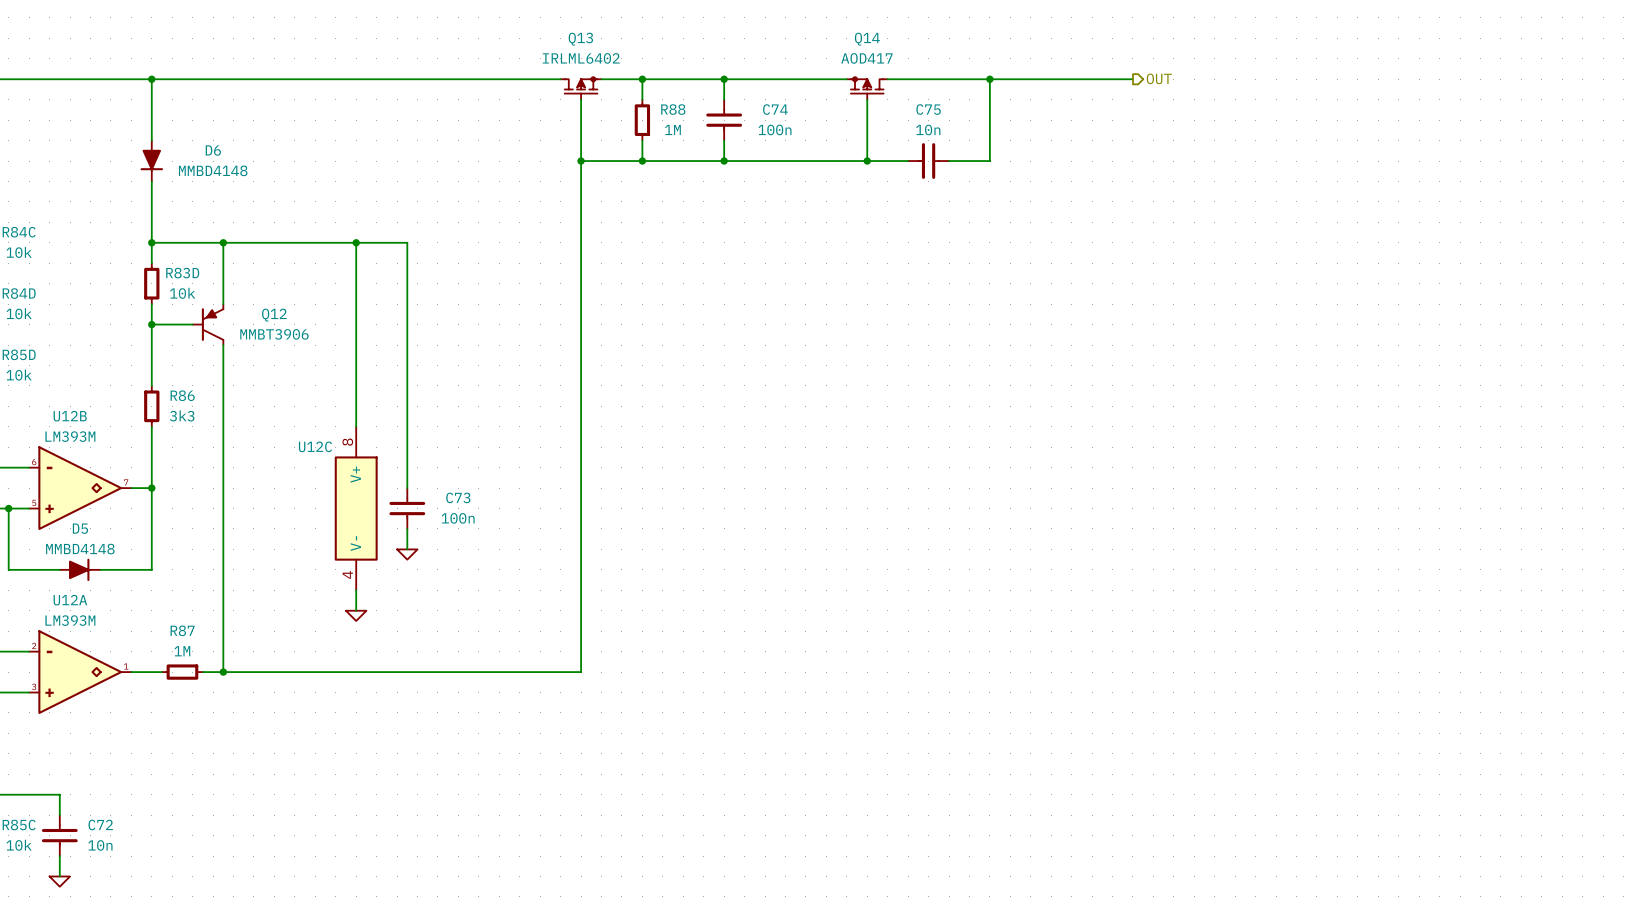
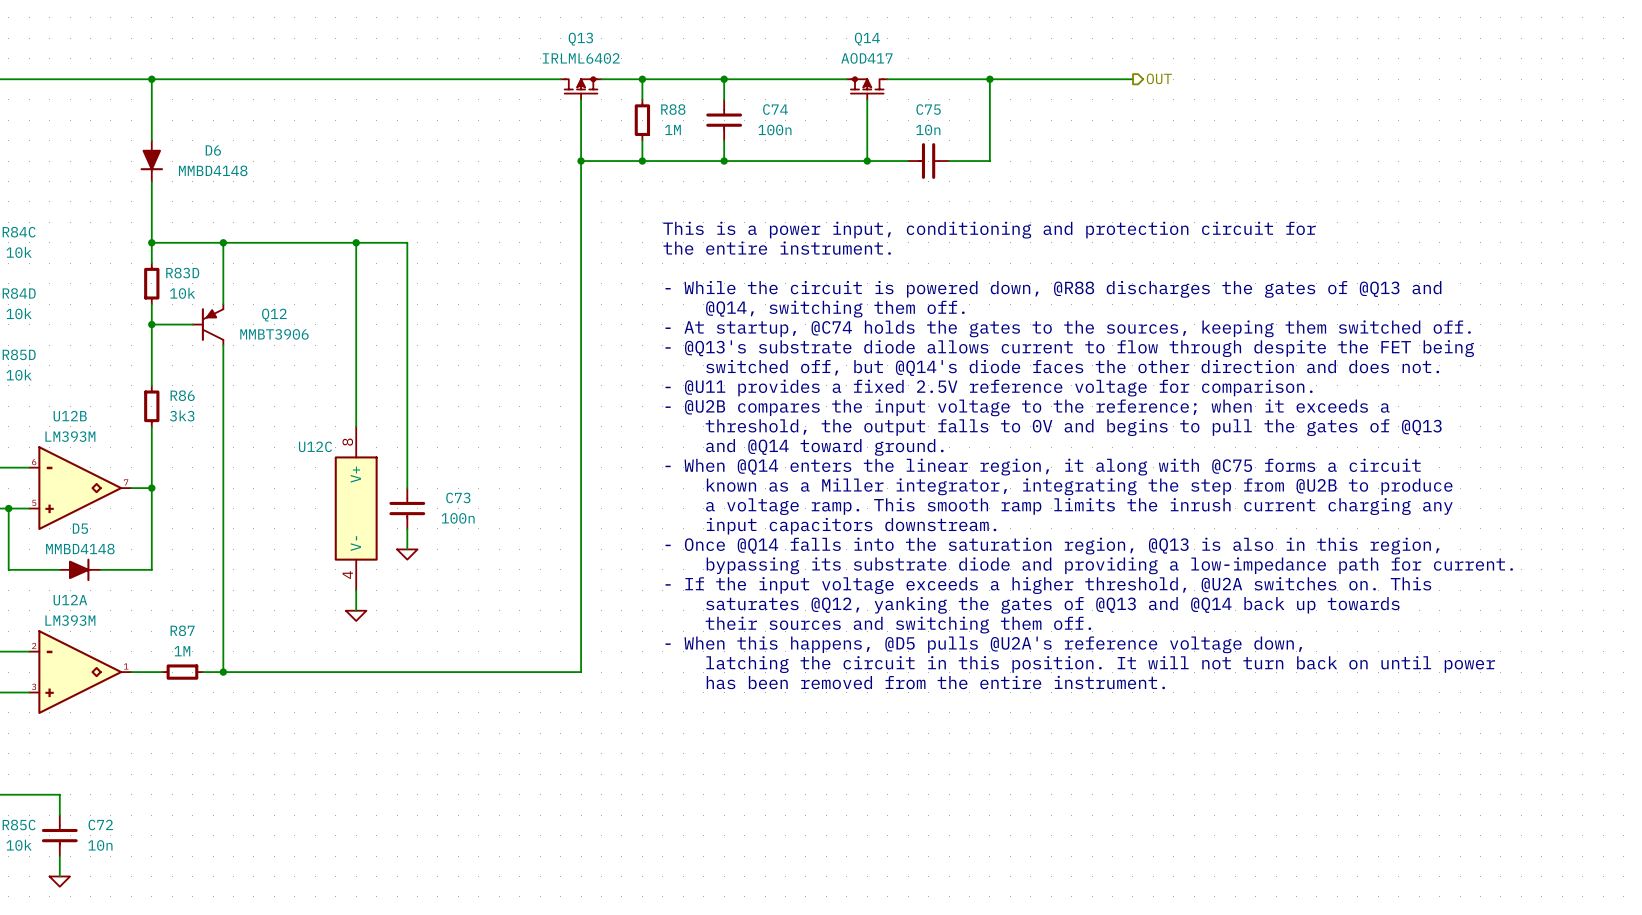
text: none -> This is a power input, conditioning and protection circuit for (989, 230)
text: none -> the entire instrument. (777, 248)
text: none -> - While the circuit is powered down, @R88 discharges the gates of @Q13 and (1053, 289)
text: none -> @Q14, switching them off. (835, 309)
text: none -> - At startup, @C74 holds the gates to the sources, keeping them switched off. (1068, 328)
text: none -> - @Q13's substrate diode allows current to flow through despite the FET being (1069, 348)
text: none -> switched off, but @Q14's diode faces the other direction and does not. (1072, 367)
text: none -> - @U11 provides a fixed 2.5V reference voltage for comparison. (989, 388)
text: none -> - @U2B compares the input voltage to the reference; when it exceeds a (1027, 407)
text: none -> threshold, the output falls to 0V and begins to pull the gates of @Q13 (1073, 427)
text: none -> and @Q14 toward ground. (824, 447)
text: none -> - When @Q14 enters the linear region, it along with @C75 forms a circuit (1043, 467)
text: none -> known as a Miller integrator, integrating the step from @U2B to produce (1079, 486)
text: none -> a voltage ramp. This smooth ramp limits the inrush current charging any (1079, 506)
text: none -> input capacitors downstream. (851, 526)
text: none -> - Once @Q14 falls into the saturation region, @Q13 is also in this region, (1052, 546)
text: none -> bypassing its substrate diode and providing a low-impedance path for current. (1109, 565)
text: none -> - If the input voltage exceeds a higher threshold, @U2A switches on. This (1048, 585)
text: none -> saturates @Q12, yanking the gates of @Q13 and @Q14 back up towards (1052, 605)
text: none -> their sources and switching them off. (898, 625)
text: none -> - When this happens, @D5 pulls @U2A's reference voltage down, (983, 644)
text: none -> latching the circuit in this position. It will not turn back on until power (1100, 664)
text: none -> has been removed from the entire instrument. (935, 682)

